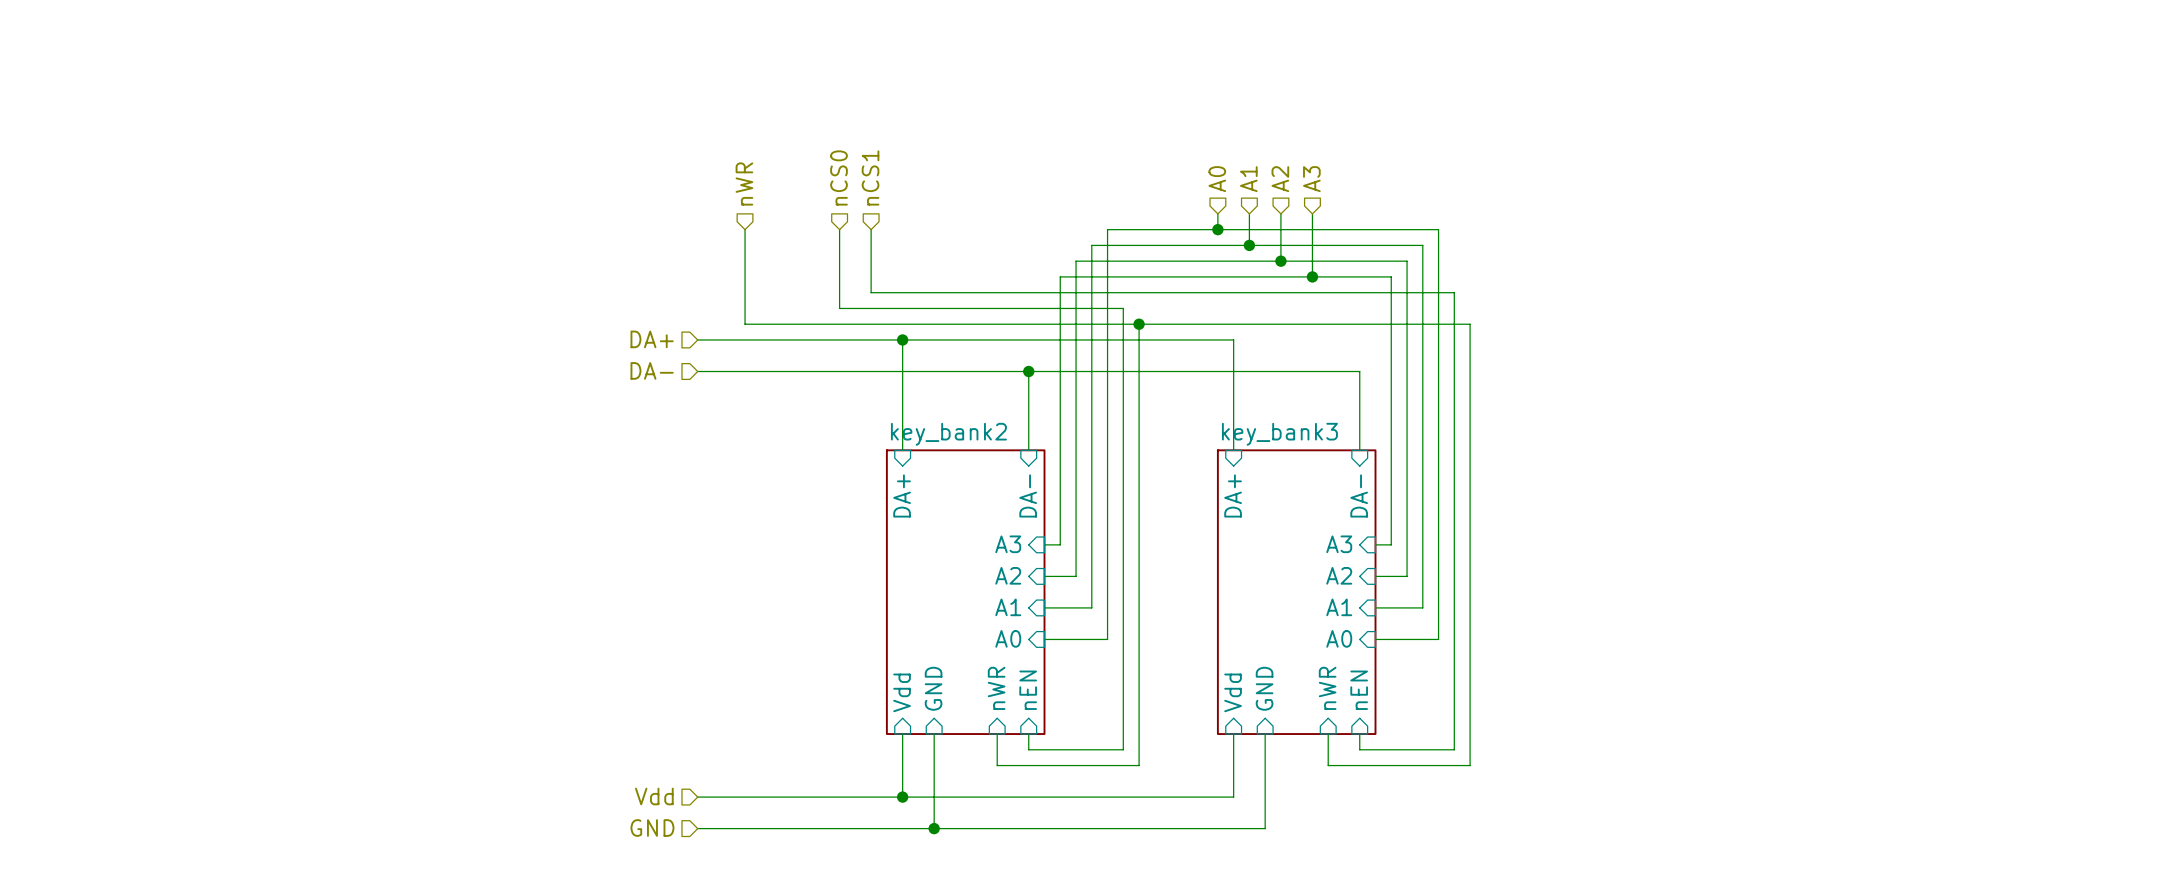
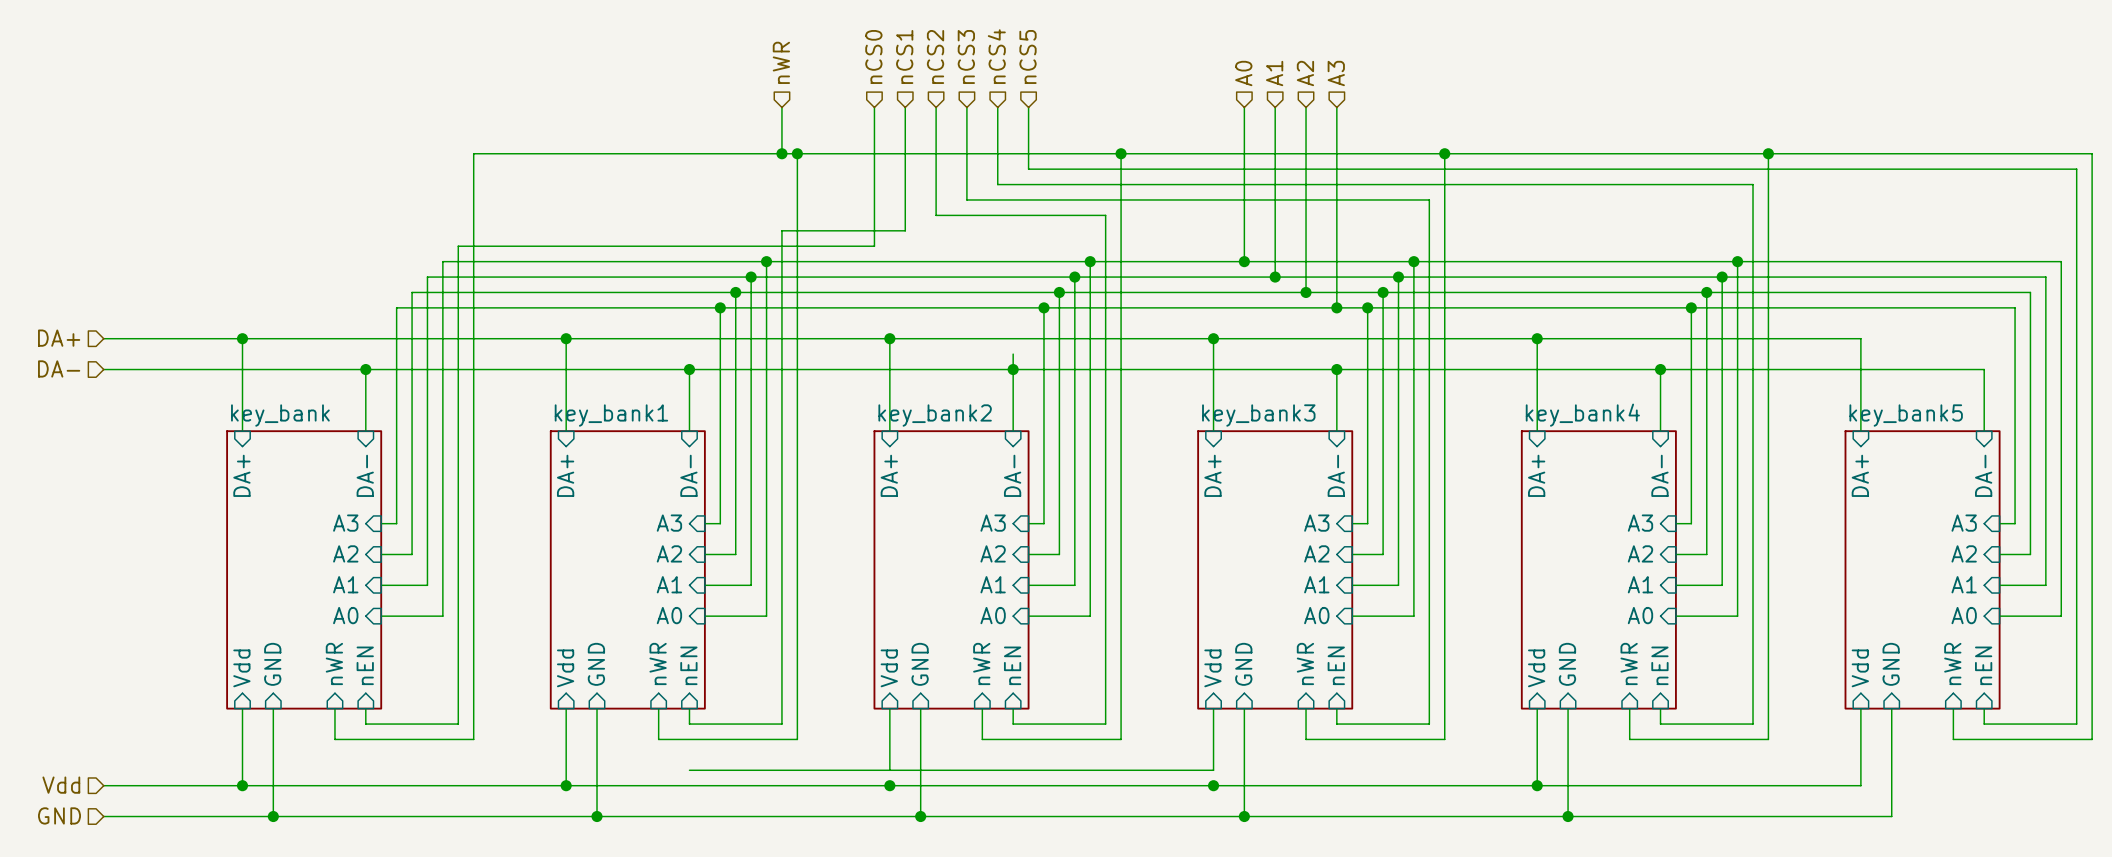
hierarchical label: none -> nCS2 (935, 56)
hierarchical label: none -> nCS3 (966, 56)
hierarchical label: none -> nCS4 (996, 56)
hierarchical label: none -> nCS5 (1028, 56)
wire: none -> (781, 107) (781, 153)
wire: none -> (874, 107) (874, 246) (458, 246) (458, 724) (365, 724) (365, 708)
wire: none -> (905, 107) (905, 230) (781, 230) (781, 724) (689, 724) (689, 708)
wire: none -> (966, 107) (966, 199) (1429, 199) (1429, 277) (2045, 277) (2045, 585) (1999, 585)
wire: none -> (997, 107) (997, 184) (1753, 184) (1753, 724) (1660, 724) (1660, 708)
wire: none -> (1028, 107) (1028, 169) (2076, 169) (2076, 724) (1984, 724) (1984, 708)
wire: none -> (1244, 107) (1244, 261)
wire: none -> (1275, 107) (1275, 277)
wire: none -> (1306, 107) (1306, 292)
wire: none -> (1336, 107) (1336, 307)
junction: none -> (781, 153)
wire: none -> (797, 153) (797, 739) (658, 739) (658, 708)
junction: none -> (797, 153)
wire: none -> (1121, 153) (1121, 307)
junction: none -> (1121, 153)
wire: none -> (1444, 153) (1444, 307) (2015, 307) (2015, 523) (1999, 523)
junction: none -> (1444, 153)
wire: none -> (1768, 153) (1768, 739) (1629, 739) (1629, 708)
junction: none -> (1768, 153)
hierarchical label position: nCS0 (839, 177) -> nCS0 (873, 56)
hierarchical label position: nCS1 (870, 177) -> nCS1 (904, 56)
hierarchical label position: A0 (1217, 179) -> A0 (1243, 73)
hierarchical label position: A1 (1248, 179) -> A1 (1274, 73)
hierarchical label position: A2 (1280, 179) -> A2 (1305, 73)
hierarchical label position: A3 (1311, 179) -> A3 (1336, 73)
hierarchical label position: nWR (744, 183) -> nWR (781, 62)
wire: (1217, 213) (1217, 229) -> none
wire: (1249, 213) (1249, 245) -> none
wire: (1280, 213) (1280, 261) -> none
wire: (1312, 213) (1312, 276) -> none
wire: (745, 229) (745, 308) -> none
wire: (839, 229) (839, 308) -> (381, 554) (412, 554) (412, 292) (828, 292)
wire: (871, 229) (871, 292) -> (381, 585) (427, 585) (427, 277) (859, 277)
wire: (1107, 229) (1107, 276) -> (1090, 215) (936, 215) (936, 107)
wire: (1123, 229) (1438, 229) (1438, 276) -> (1105, 215) (1105, 292) (2030, 292) (2030, 554) (1999, 554)
junction: (1217, 229) -> none
junction: (1249, 245) -> none
junction: (1280, 261) -> none
wire: none -> (766, 261) (766, 616) (704, 616)
junction: none -> (766, 261)
wire: (1060, 276) (1060, 324) -> (1043, 261) (442, 261) (442, 616) (381, 616)
junction: none -> (1090, 261)
junction: none -> (1244, 261)
junction: (1312, 276) -> none
wire: (1391, 276) (1391, 324) -> (1367, 261) (2061, 261) (2061, 616) (1999, 616)
junction: none -> (1413, 261)
wire: none -> (1737, 261) (1737, 616) (1675, 616)
junction: none -> (1737, 261)
wire: none -> (751, 277) (751, 585) (704, 585)
junction: none -> (751, 277)
wire: (1091, 292) (1091, 245) (1422, 245) (1422, 292) -> none
junction: none -> (1074, 277)
junction: none -> (1275, 277)
junction: none -> (1398, 277)
wire: none -> (1722, 277) (1722, 585) (1675, 585)
junction: none -> (1722, 277)
junction: none -> (735, 292)
wire: (1076, 308) (1076, 261) (1407, 261) (1407, 308) -> none
junction: none -> (1059, 292)
junction: none -> (1306, 292)
junction: none -> (1383, 292)
wire: none -> (1706, 292) (1706, 554) (1675, 554)
junction: none -> (1706, 292)
wire: none -> (720, 307) (720, 523) (704, 523)
junction: none -> (720, 307)
junction: none -> (1043, 307)
junction: (1139, 324) -> none
junction: none -> (1336, 307)
junction: none -> (1367, 307)
wire: none -> (1691, 307) (1691, 523) (1675, 523)
junction: none -> (1691, 307)
hierarchical label: DA+ (652, 339) -> none
wire: (697, 339) (1233, 339) (1233, 355) -> none
wire: (902, 339) (902, 355) -> none
junction position: (902, 339) -> (889, 338)
hierarchical label: none -> DA+ (59, 338)
wire: none -> (103, 338) (1860, 338) (1860, 431)
wire: none -> (242, 338) (242, 431)
junction: none -> (242, 338)
wire: none -> (566, 338) (566, 431)
junction: none -> (566, 338)
junction: none -> (1213, 338)
wire: none -> (1537, 338) (1537, 431)
junction: none -> (1537, 338)
hierarchical label: DA- (652, 370) -> none
wire: (697, 371) (1359, 371) (1359, 387) -> none
junction position: (1028, 371) -> (1013, 369)
hierarchical label: none -> DA- (59, 368)
wire: none -> (103, 369) (1984, 369) (1984, 431)
wire: none -> (365, 369) (365, 431)
junction: none -> (365, 369)
wire: none -> (689, 369) (689, 431)
junction: none -> (689, 369)
junction: none -> (1336, 369)
wire: none -> (1660, 369) (1660, 431)
junction: none -> (1660, 369)
sheet pin: none -> DA+ (241, 475)
sheet pin: none -> DA- (365, 475)
sheet pin: none -> DA+ (565, 475)
sheet pin: none -> DA- (688, 475)
sheet pin: none -> DA+ (1536, 475)
sheet pin: none -> DA- (1659, 475)
sheet pin: none -> DA+ (1860, 475)
sheet pin: none -> DA- (1983, 475)
sheet pin: none -> A3 (345, 523)
wire: none -> (381, 523) (396, 523) (396, 307) (735, 307) (735, 554) (704, 554)
sheet pin: none -> A3 (669, 523)
sheet pin: none -> A3 (1640, 523)
sheet pin: none -> A3 (1964, 523)
sheet pin: none -> A2 (345, 553)
sheet pin: none -> A2 (669, 553)
sheet pin: none -> A2 (1640, 553)
sheet pin: none -> A2 (1964, 553)
sheet key_bank: none -> (304, 569)
sheet key_bank1: none -> (627, 569)
sheet key_bank4: none -> (1598, 569)
sheet key_bank5: none -> (1922, 569)
sheet pin: none -> A1 (345, 584)
sheet pin: none -> A1 (669, 584)
sheet pin: none -> A1 (1640, 584)
sheet pin: none -> A1 (1964, 584)
sheet pin: none -> A0 (345, 615)
sheet pin: none -> A0 (669, 615)
sheet pin: none -> A0 (1640, 615)
sheet pin: none -> A0 (1964, 615)
sheet pin: none -> GND (272, 664)
sheet pin: none -> nWR (334, 663)
sheet pin: none -> GND (596, 664)
sheet pin: none -> nWR (658, 663)
sheet pin: none -> GND (1567, 664)
sheet pin: none -> nWR (1629, 663)
sheet pin: none -> GND (1891, 664)
sheet pin: none -> nWR (1952, 663)
sheet pin: none -> nEN (365, 665)
sheet pin: none -> nEN (688, 665)
sheet pin: none -> nEN (1659, 665)
sheet pin: none -> nEN (1983, 665)
sheet pin: none -> Vdd (241, 668)
sheet pin: none -> Vdd (565, 668)
sheet pin: none -> Vdd (1536, 668)
sheet pin: none -> Vdd (1860, 668)
wire: none -> (242, 708) (242, 785)
wire: none -> (273, 708) (273, 816)
wire: none -> (334, 708) (334, 739) (473, 739) (473, 153) (2092, 153) (2092, 739) (1953, 739) (1953, 708)
wire: none -> (566, 708) (566, 785)
wire: none -> (597, 708) (597, 816)
wire: none -> (1537, 708) (1537, 785)
wire: none -> (1568, 708) (1568, 816)
wire: none -> (1860, 708) (1860, 785) (103, 785)
wire: none -> (1891, 708) (1891, 816) (103, 816)
hierarchical label: Vdd (654, 796) -> none
junction position: (902, 797) -> (889, 785)
hierarchical label: none -> Vdd (61, 785)
junction: none -> (242, 785)
junction: none -> (566, 785)
junction: none -> (1213, 785)
junction: none -> (1537, 785)
hierarchical label: GND (652, 828) -> none
wire: (697, 828) (1265, 828) -> (1244, 816) (1244, 801)
wire: none -> (920, 801) (920, 816)
junction position: (934, 828) -> (920, 816)
hierarchical label: none -> GND (59, 815)
junction: none -> (273, 816)
junction: none -> (597, 816)
junction: none -> (1244, 816)
junction: none -> (1568, 816)

